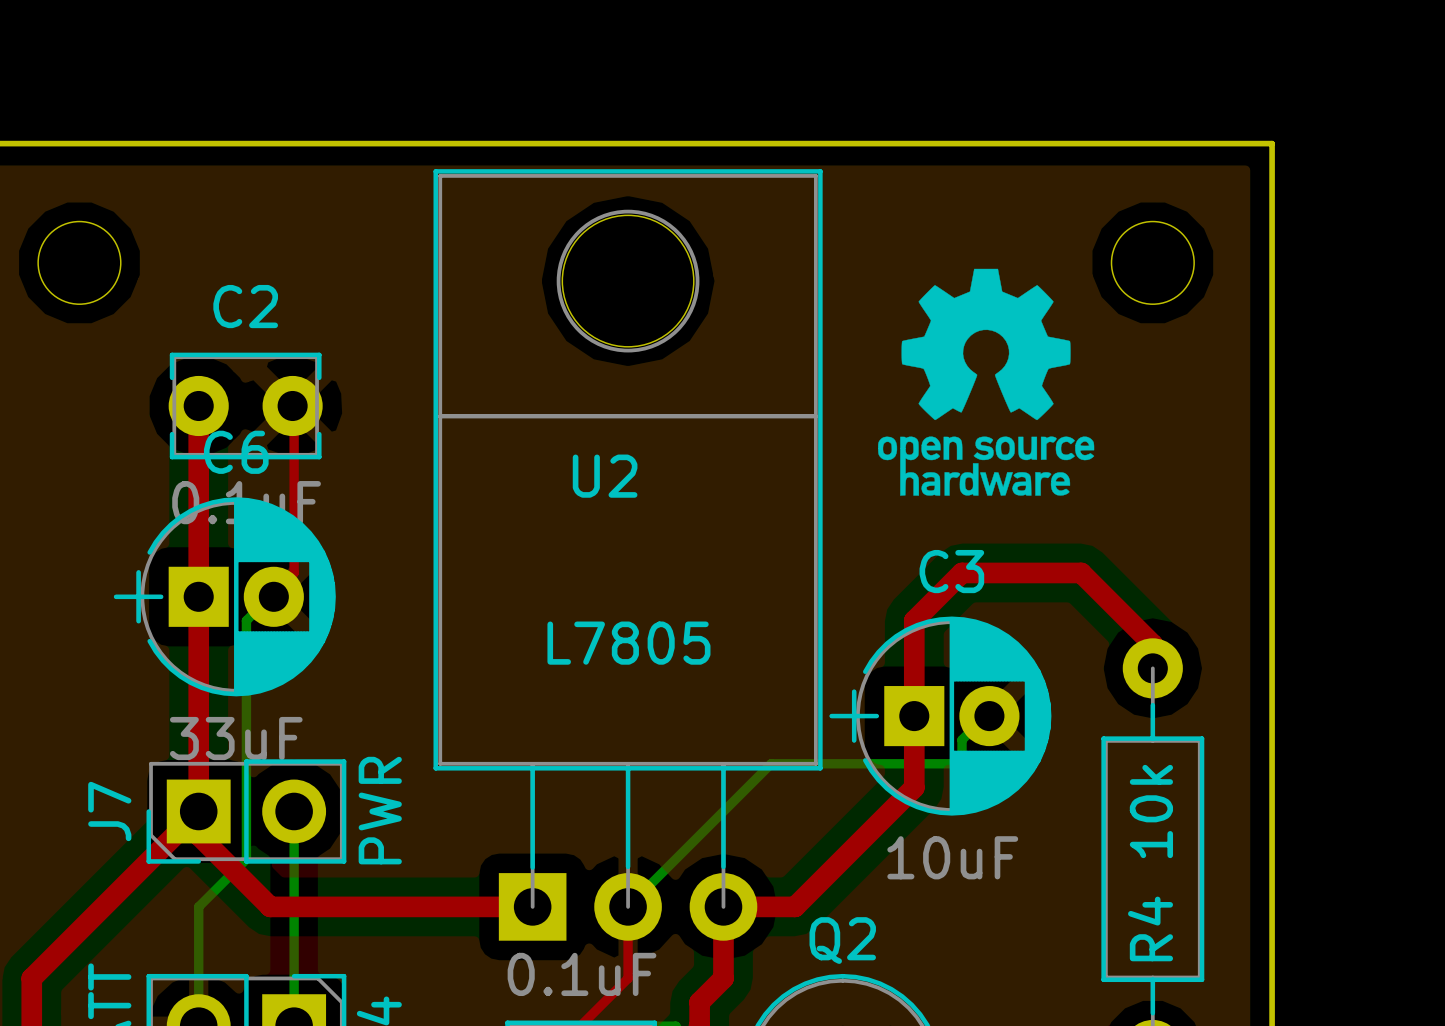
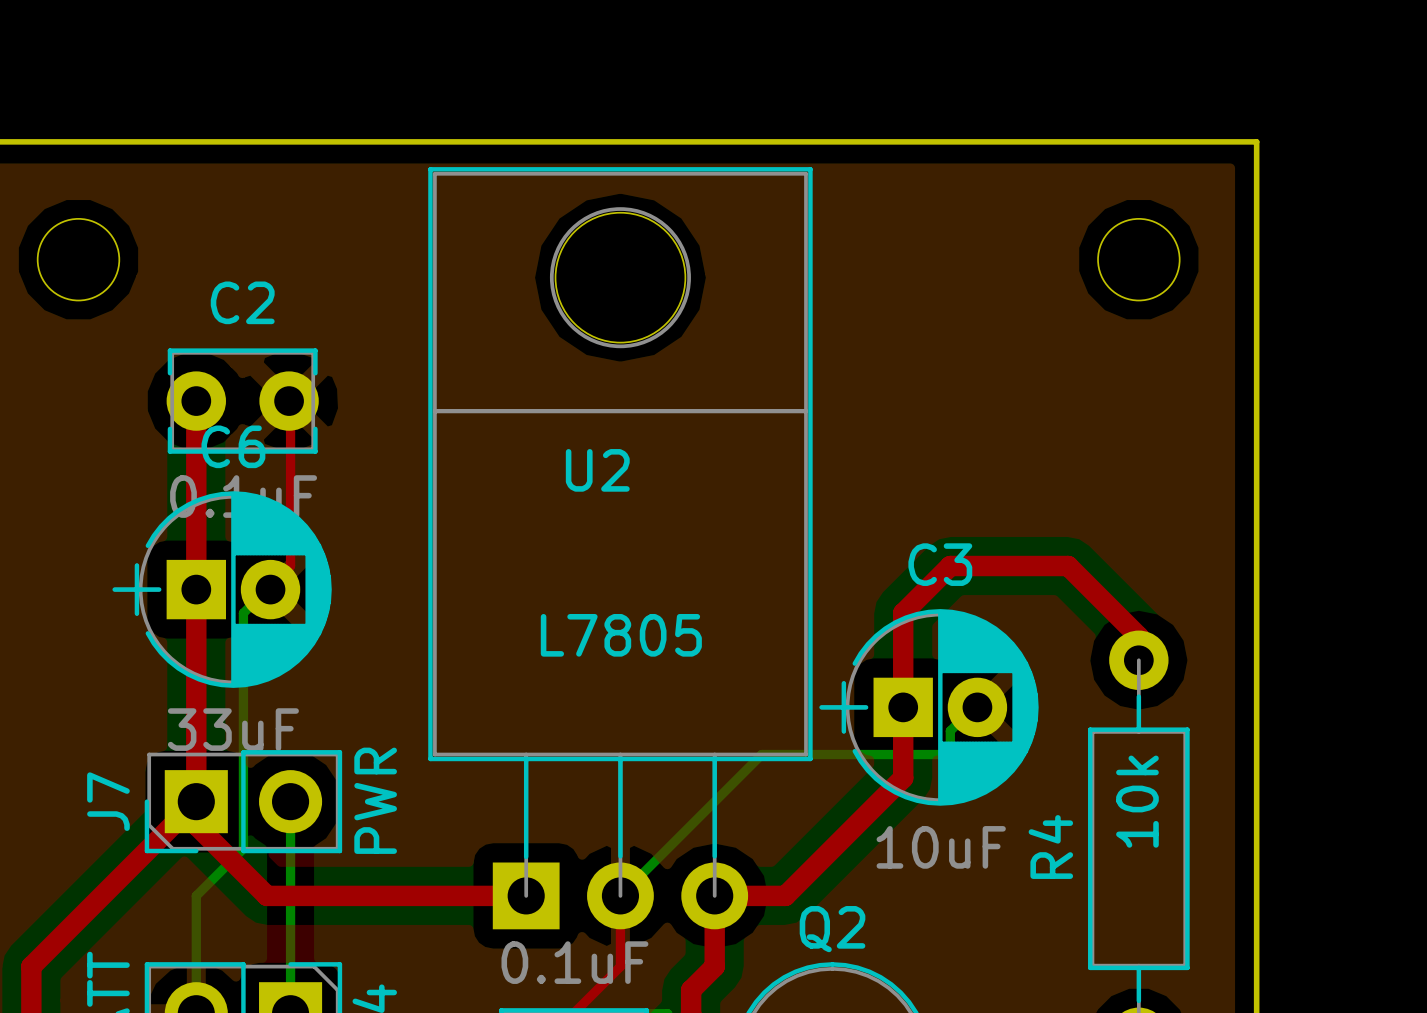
drawing: [877, 268, 1095, 496] -> none
R4 name position: R4 (1150, 928) -> R4 (1050, 847)

